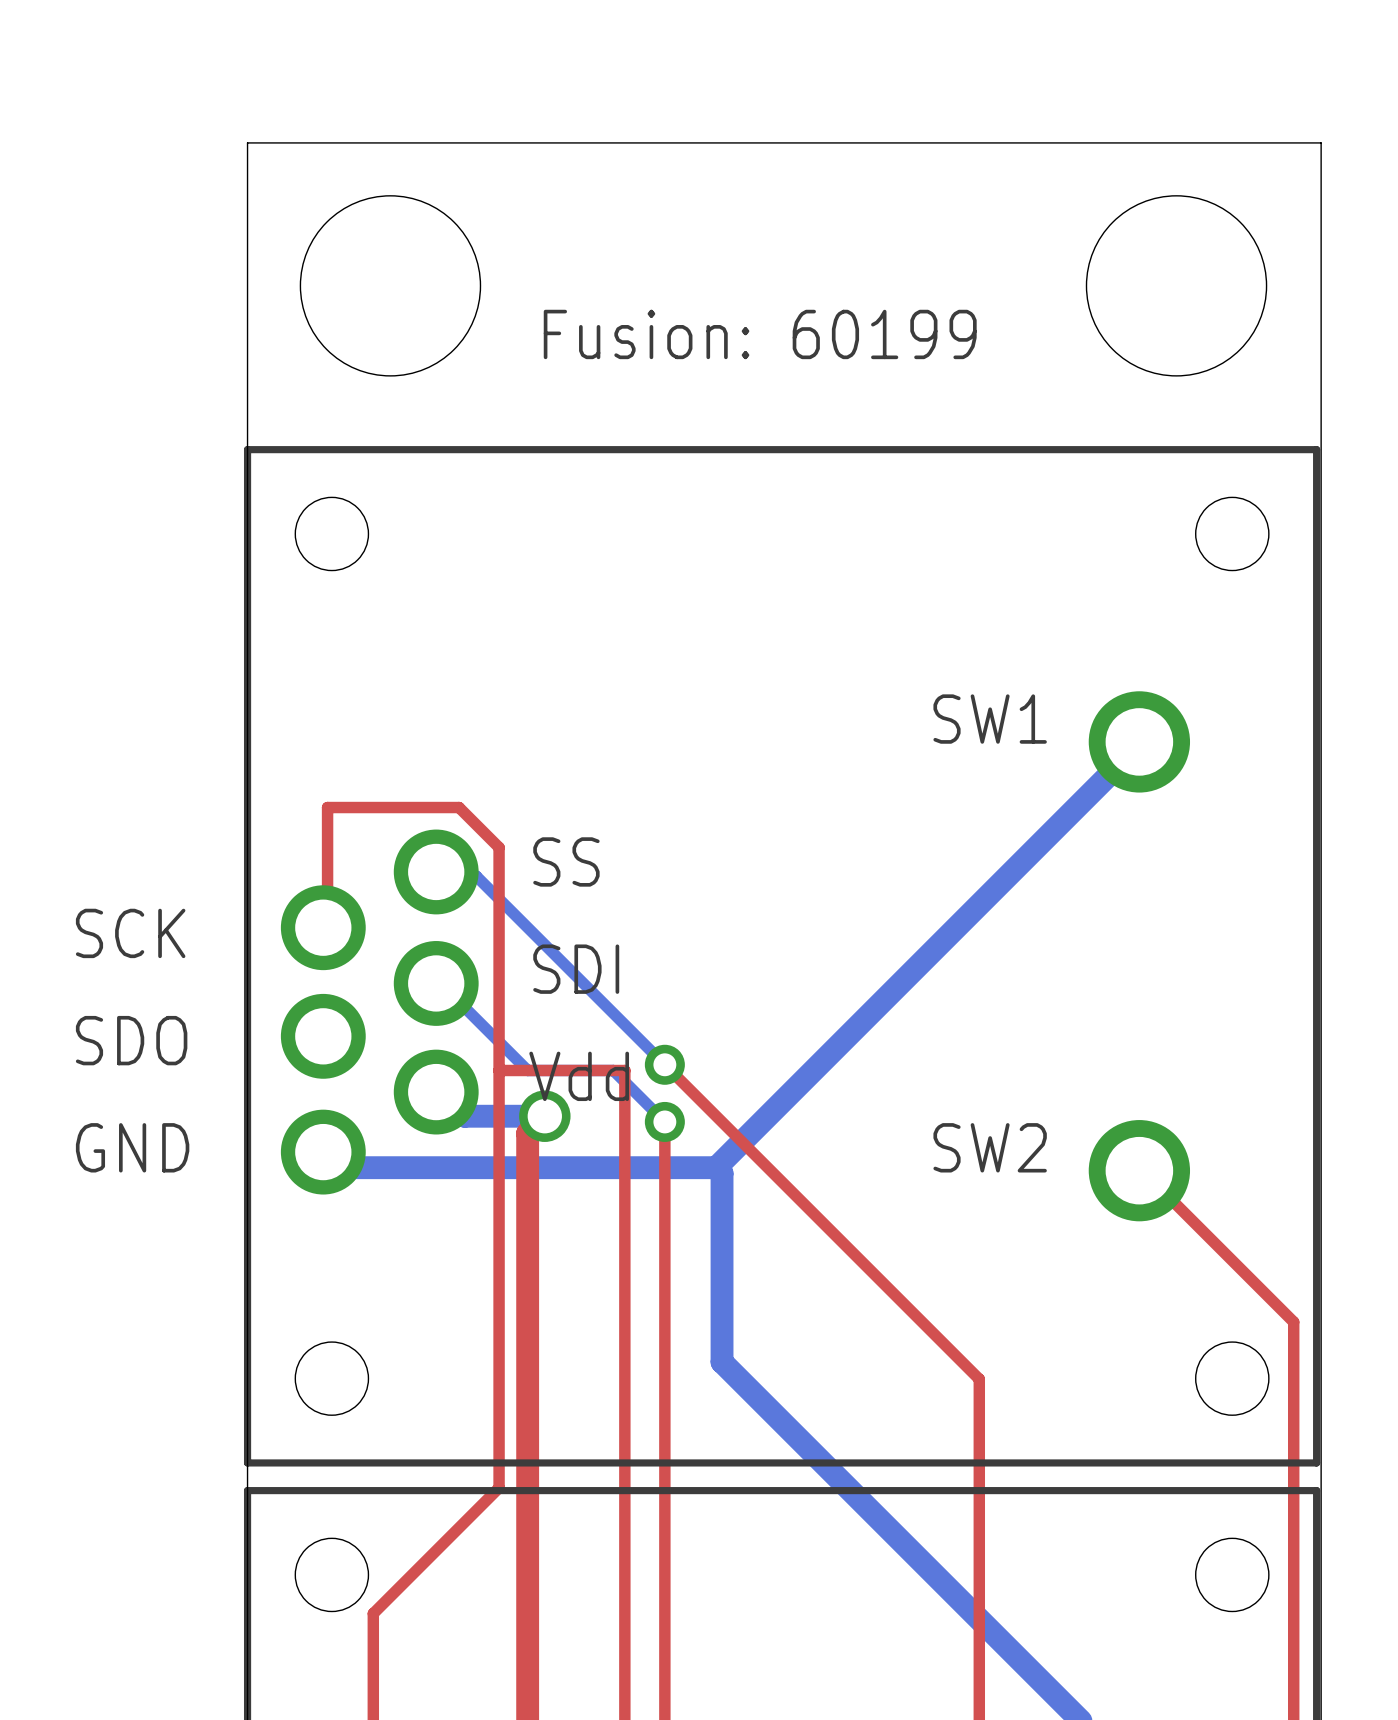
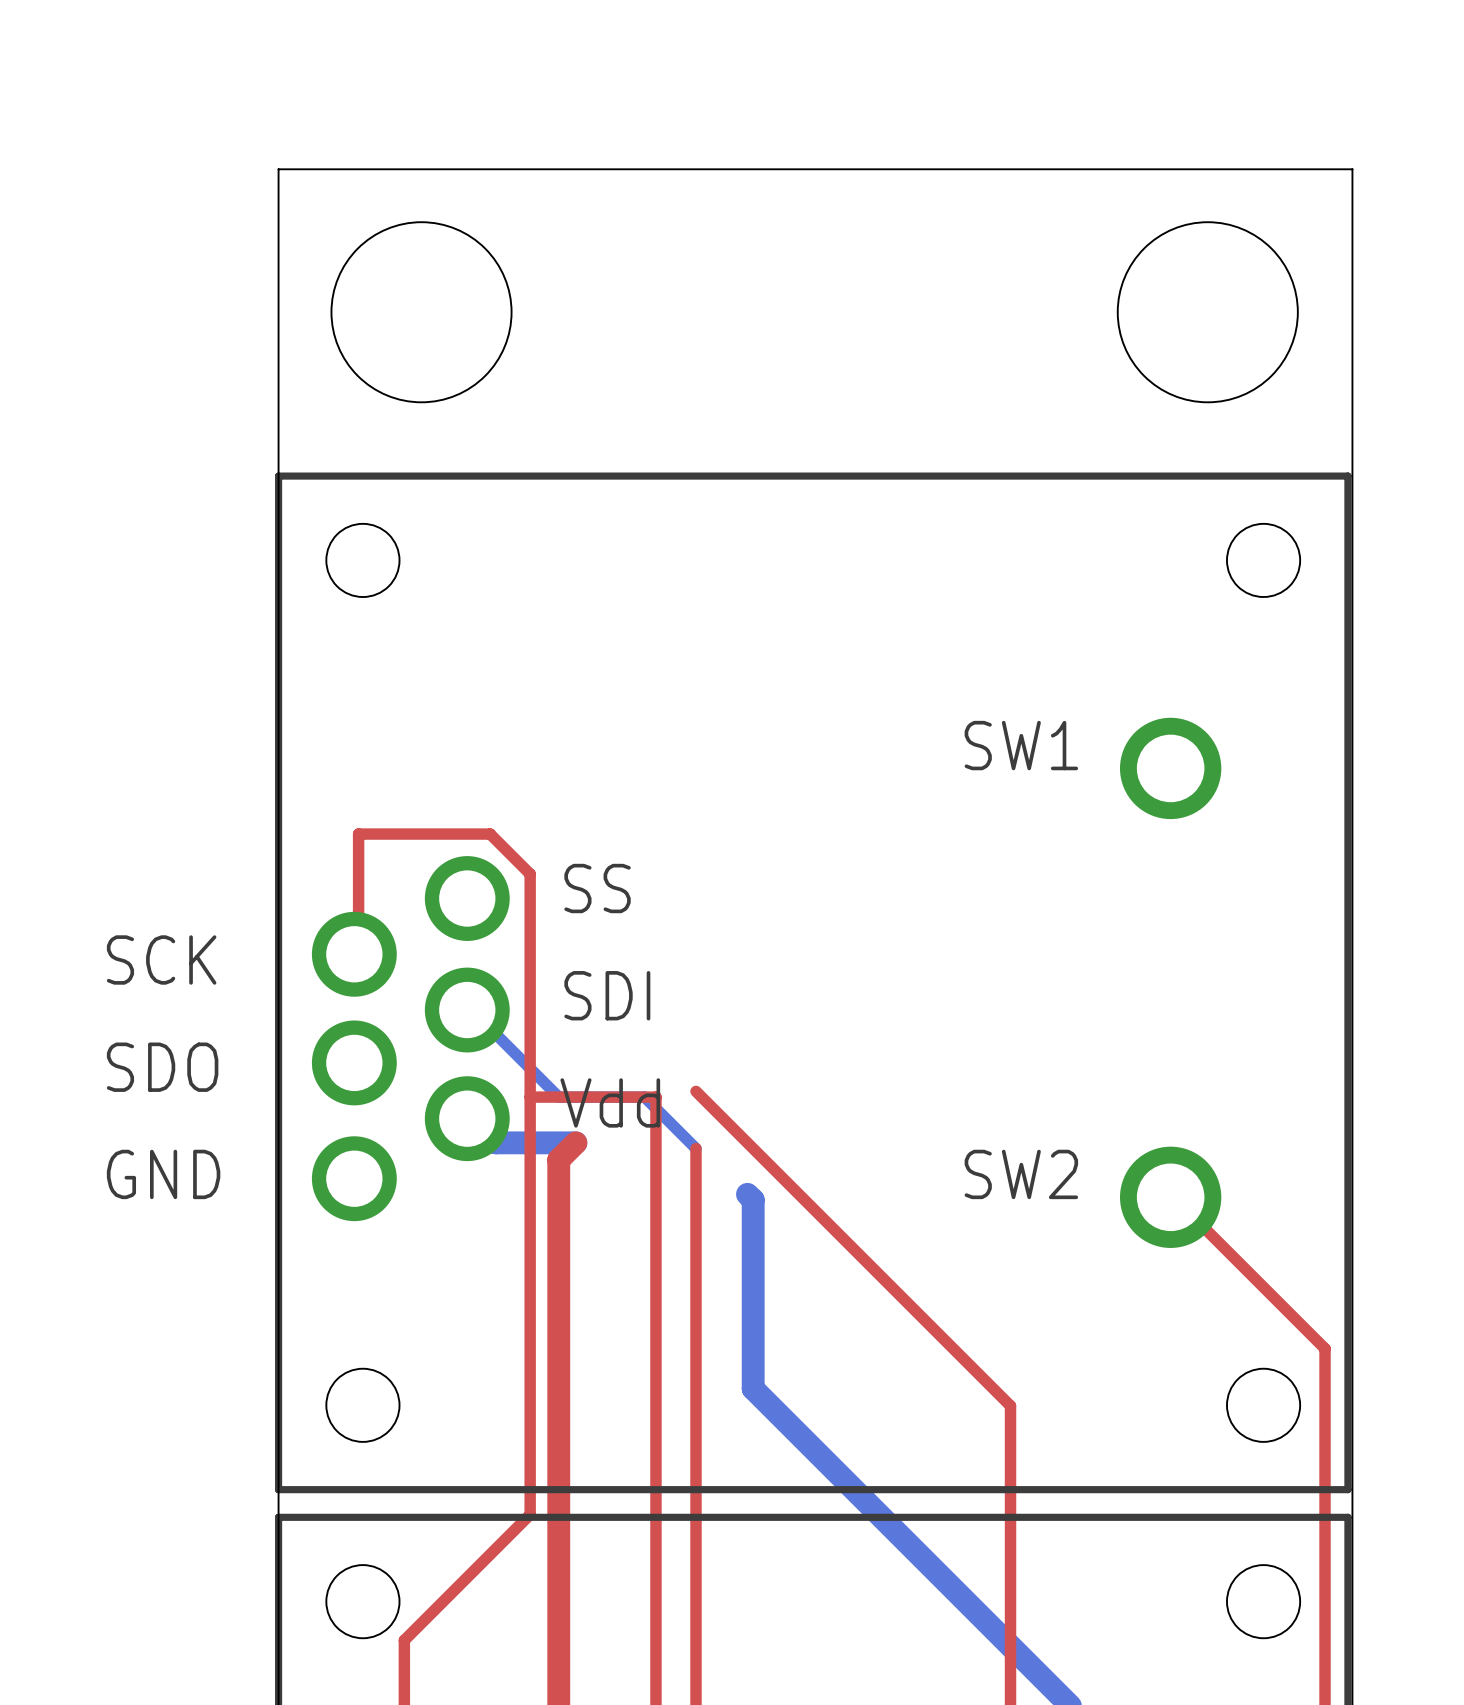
text: Fusion: 60199 (760, 334) -> none
bottom track: (1139, 741) (1139, 744) (716, 1167) (339, 1167) (323, 1152) -> none
bottom track: (436, 871) (441, 876) (476, 876) (664, 1064) -> none
via: (664, 1064) -> none
via: (544, 1116) -> none
via: (664, 1121) -> none

